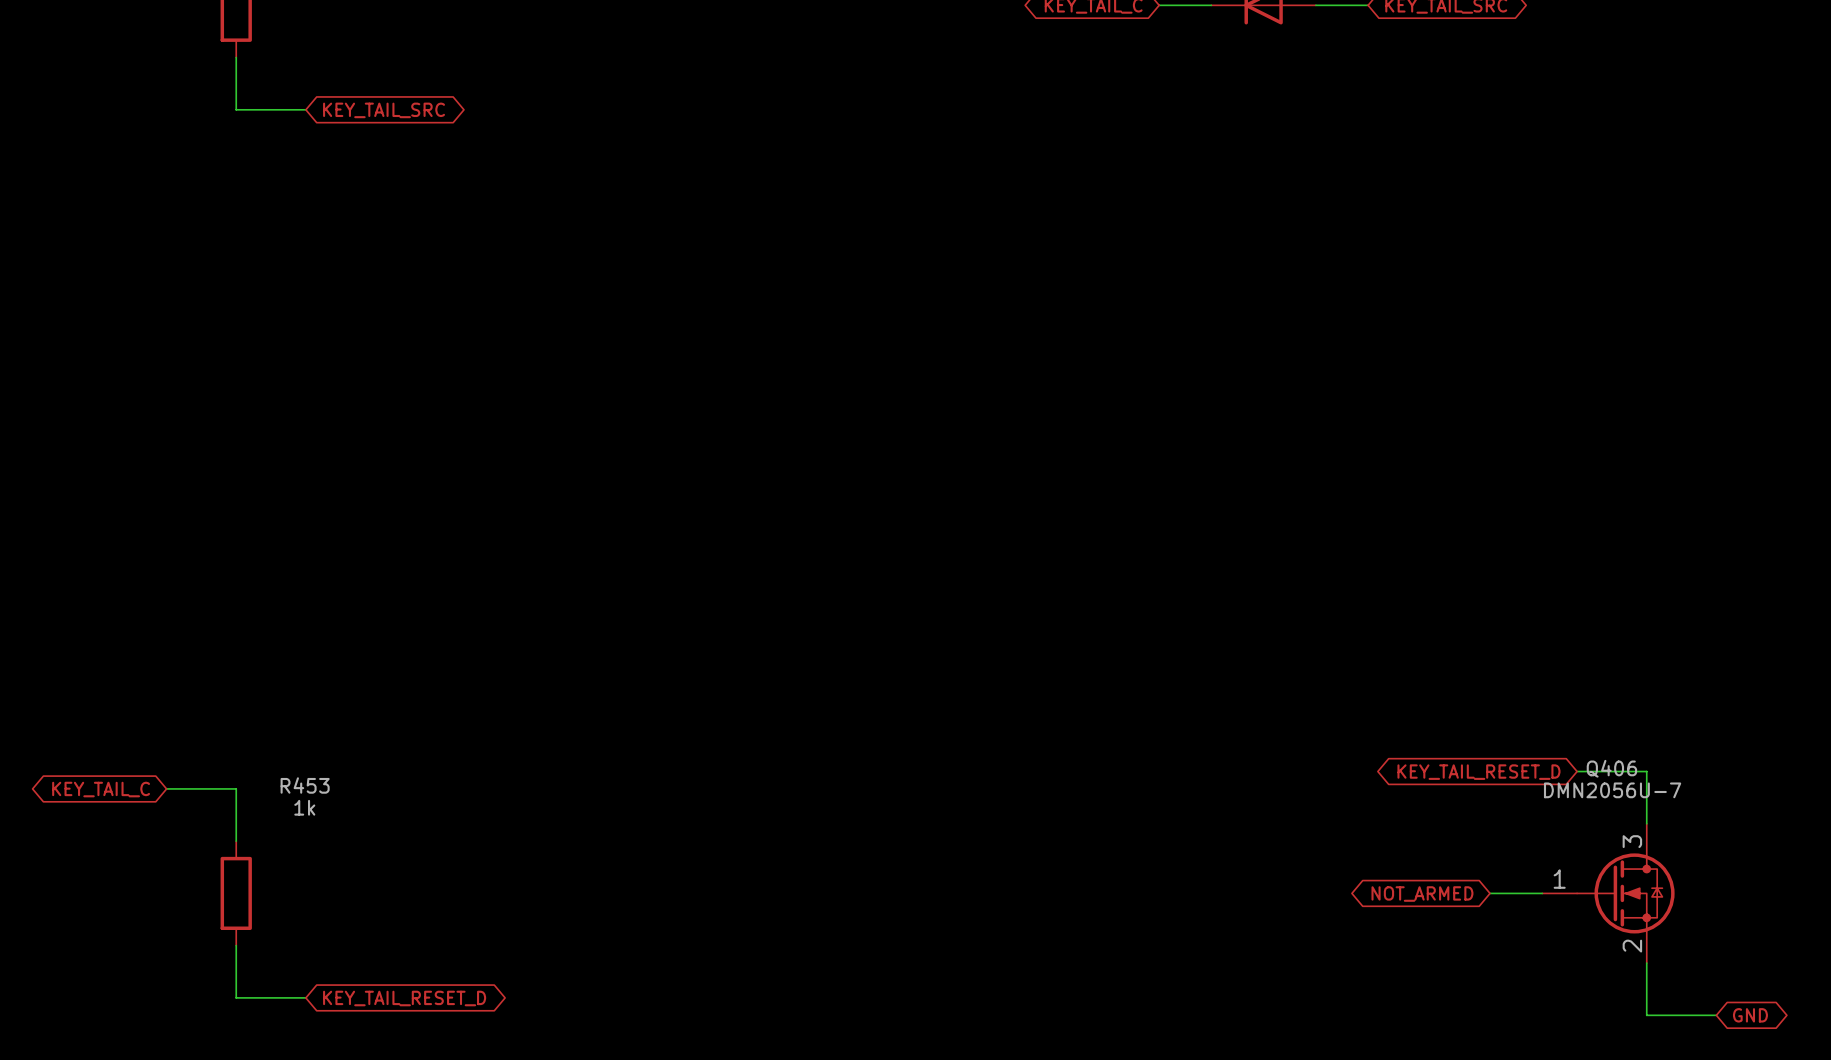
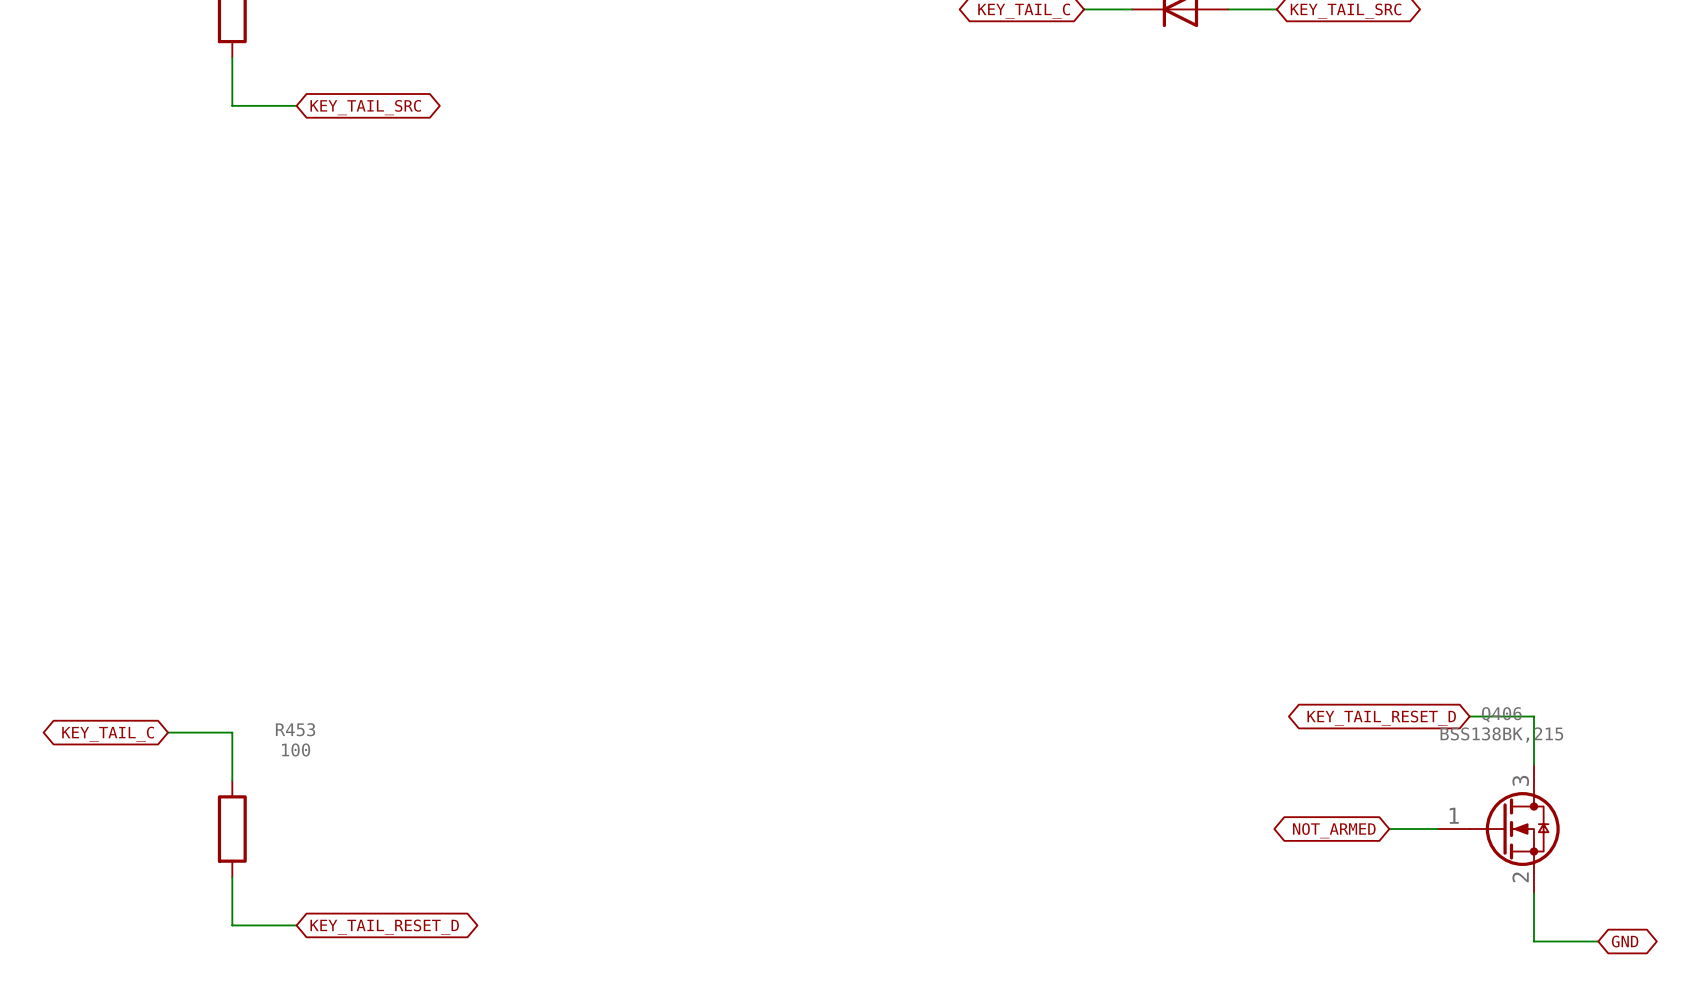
Q406 value: DMN2056U-7 (1612, 790) -> BSS138BK,215 (1501, 735)
R453 value: 1k (304, 807) -> 100 (296, 749)

